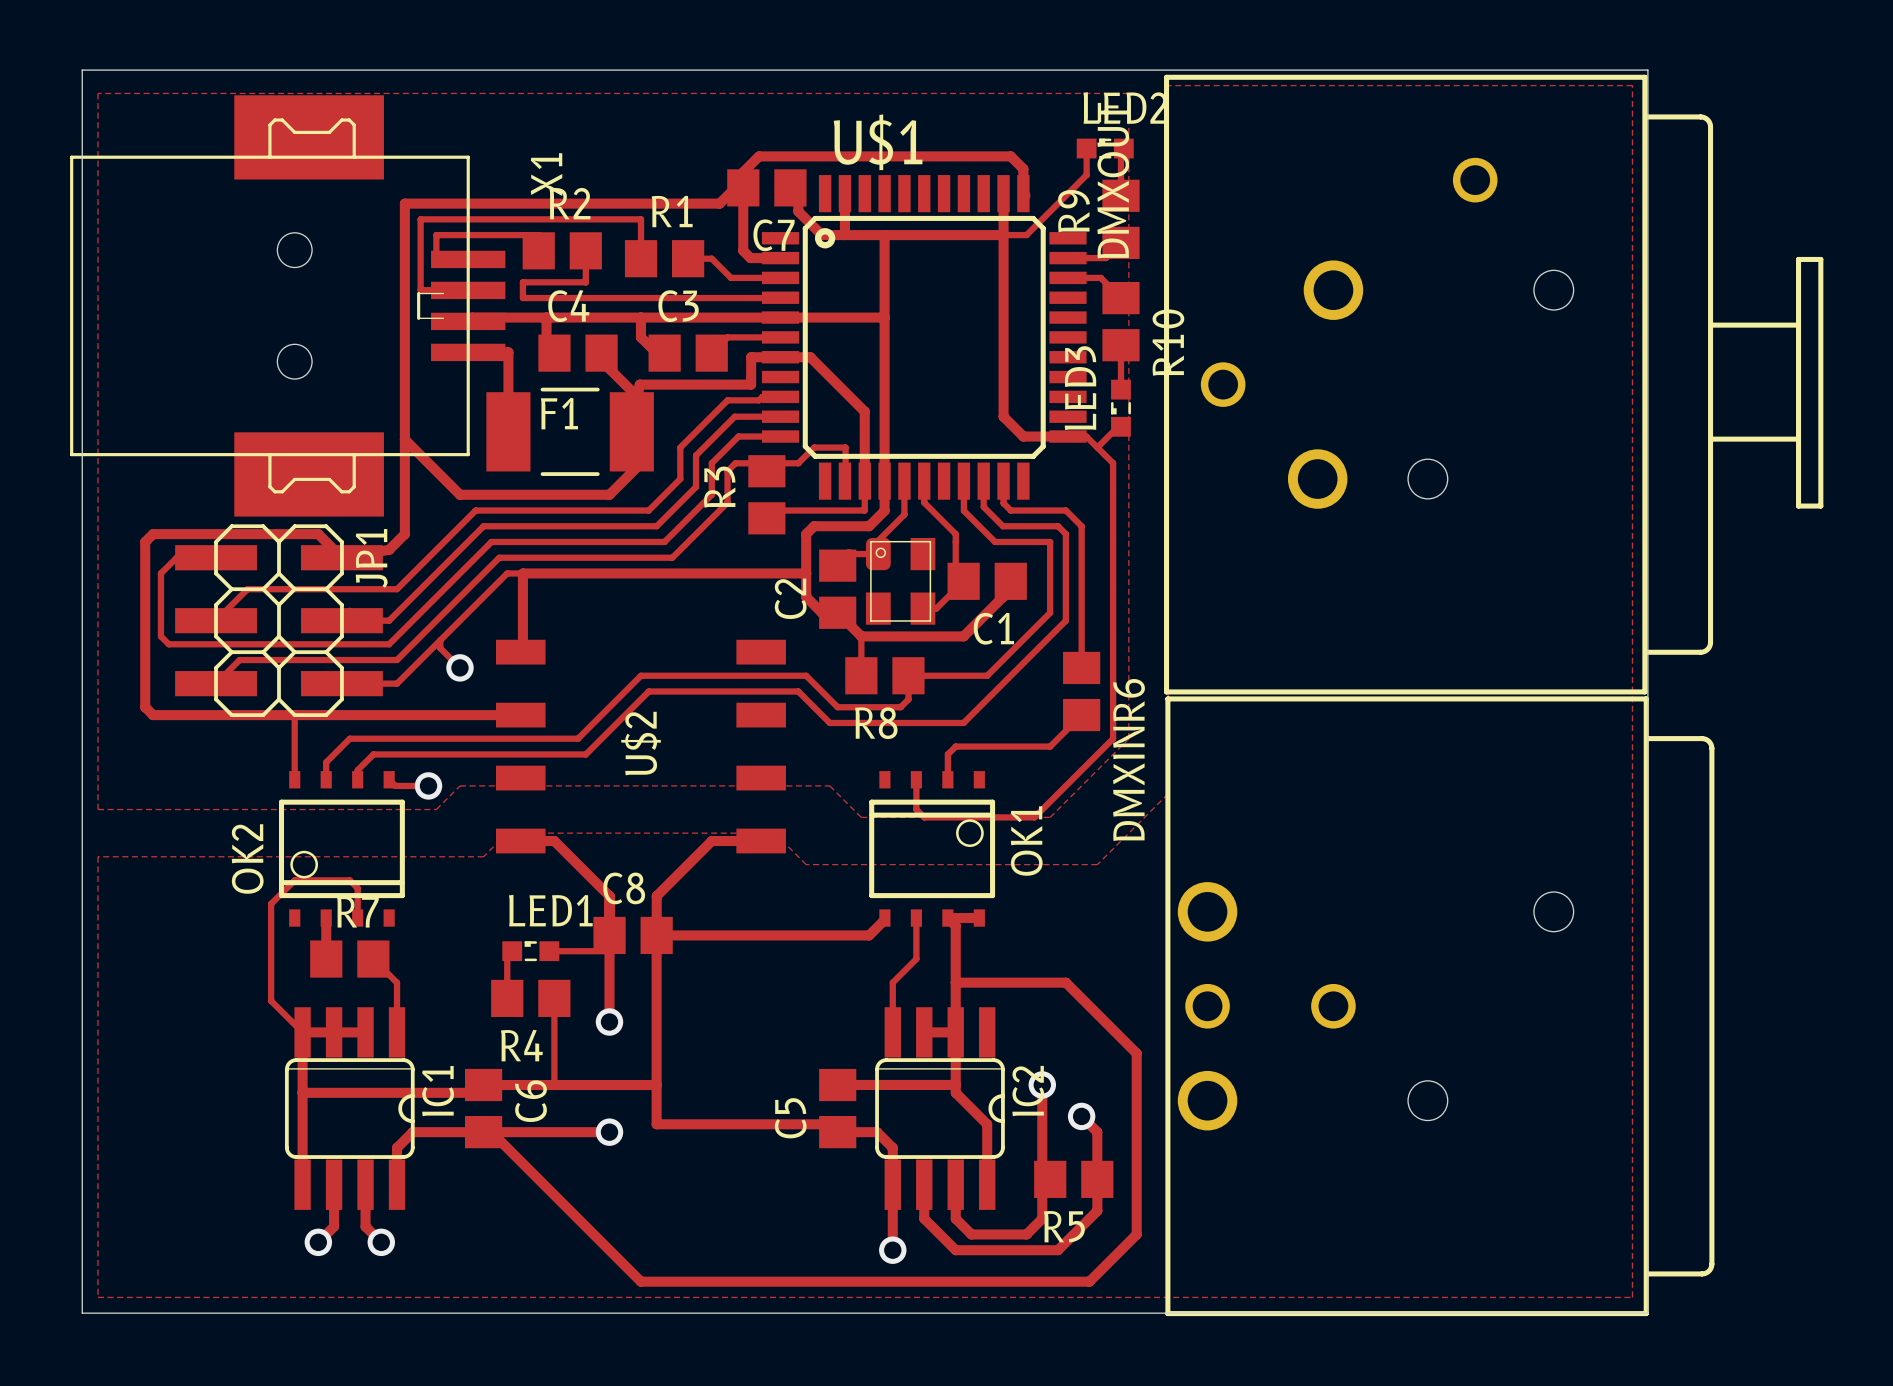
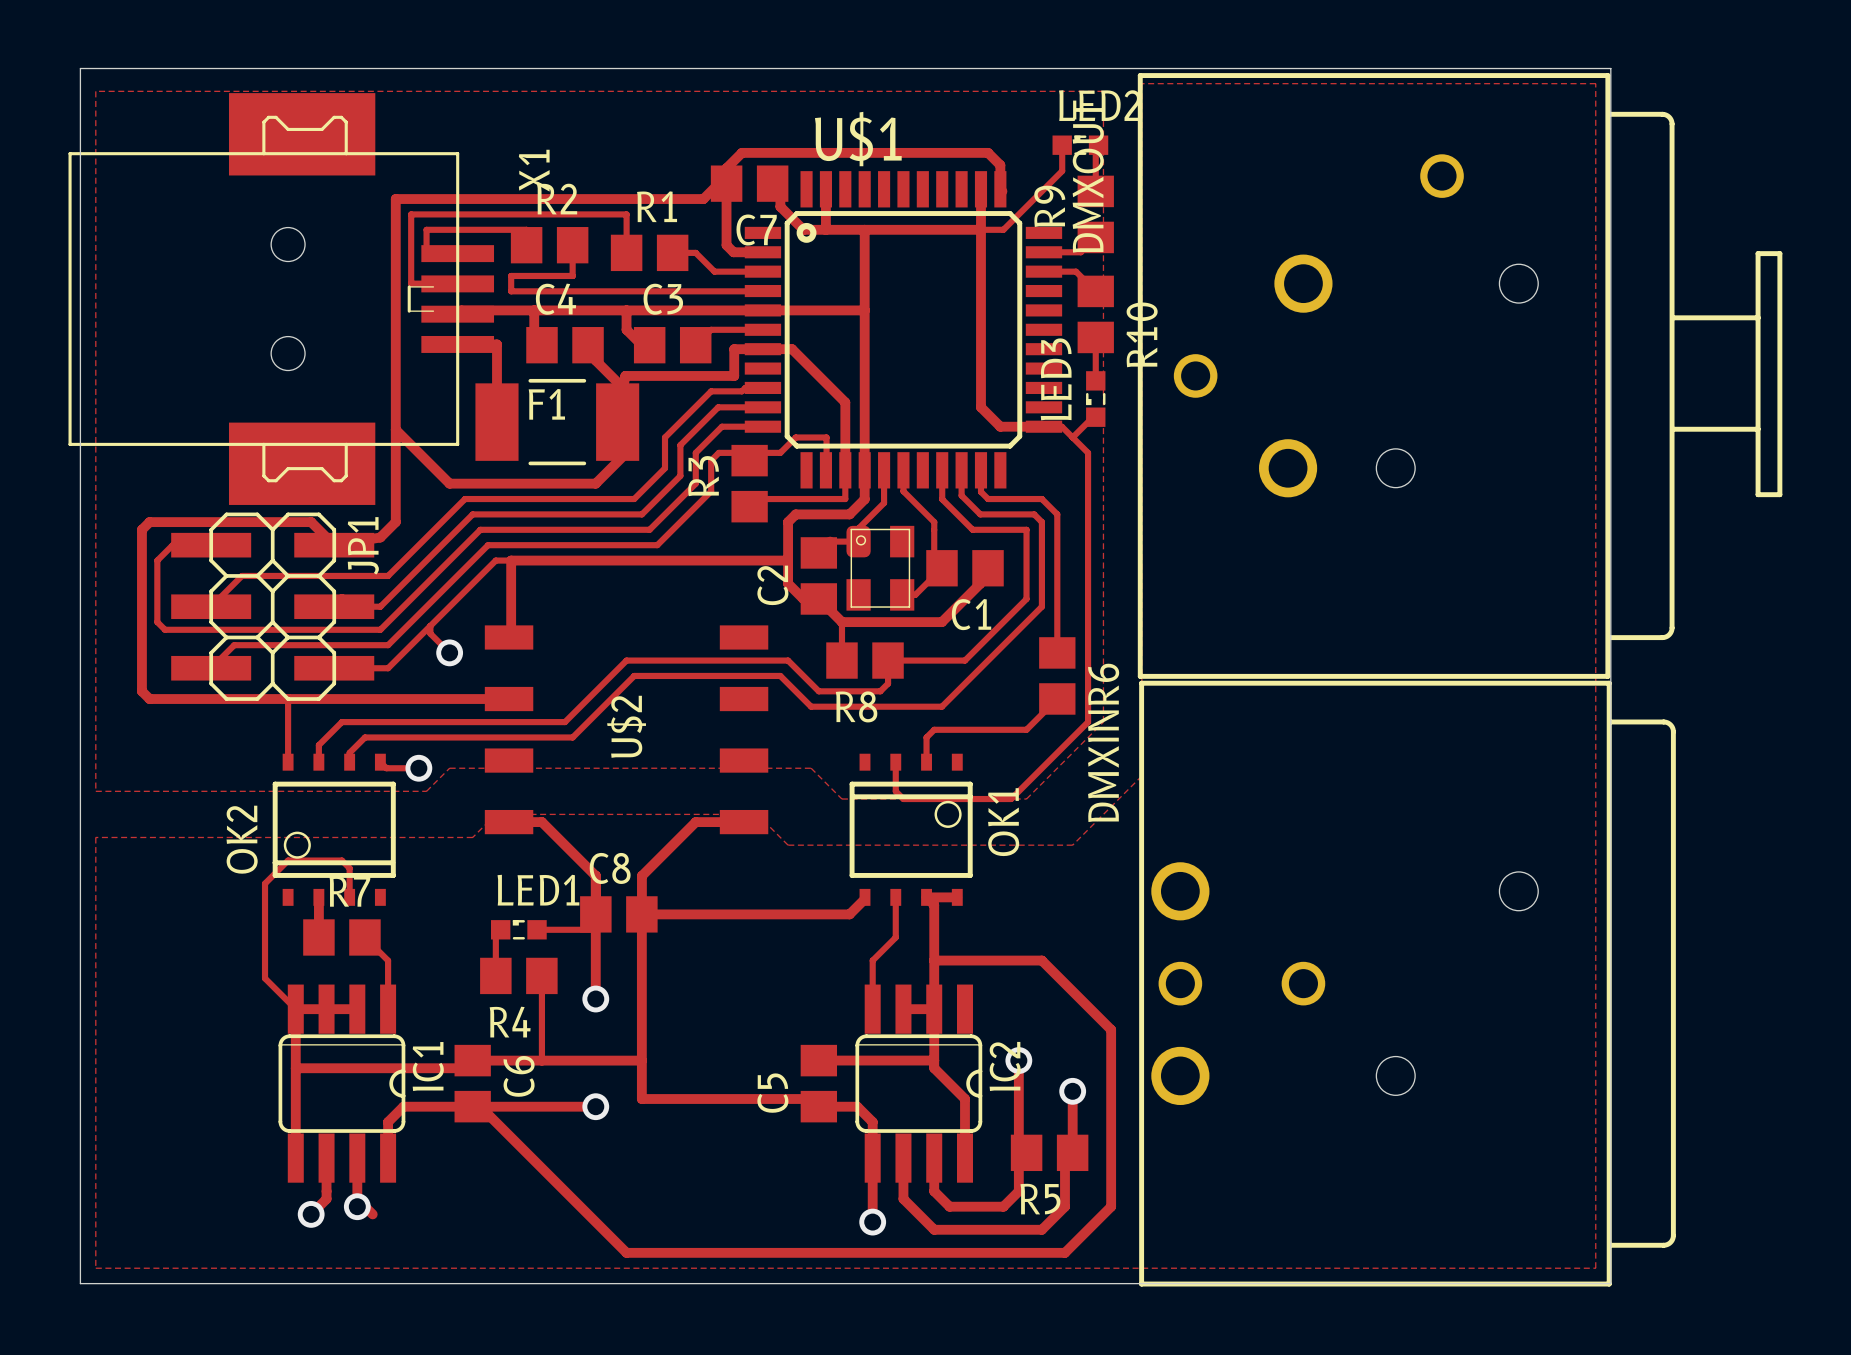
track: (1081, 1116) (1097, 1132) (1097, 1179) -> none
via position: (1081, 1116) -> (1072, 1091)
track: (1097, 1179) (1097, 1210) (1058, 1250) (955, 1250) (924, 1218) -> (1072, 1091) (1072, 1152) (1064, 1160) (1064, 1206) (1041, 1229) (934, 1229) (903, 1199) (903, 1191)
via position: (381, 1242) -> (357, 1206)

